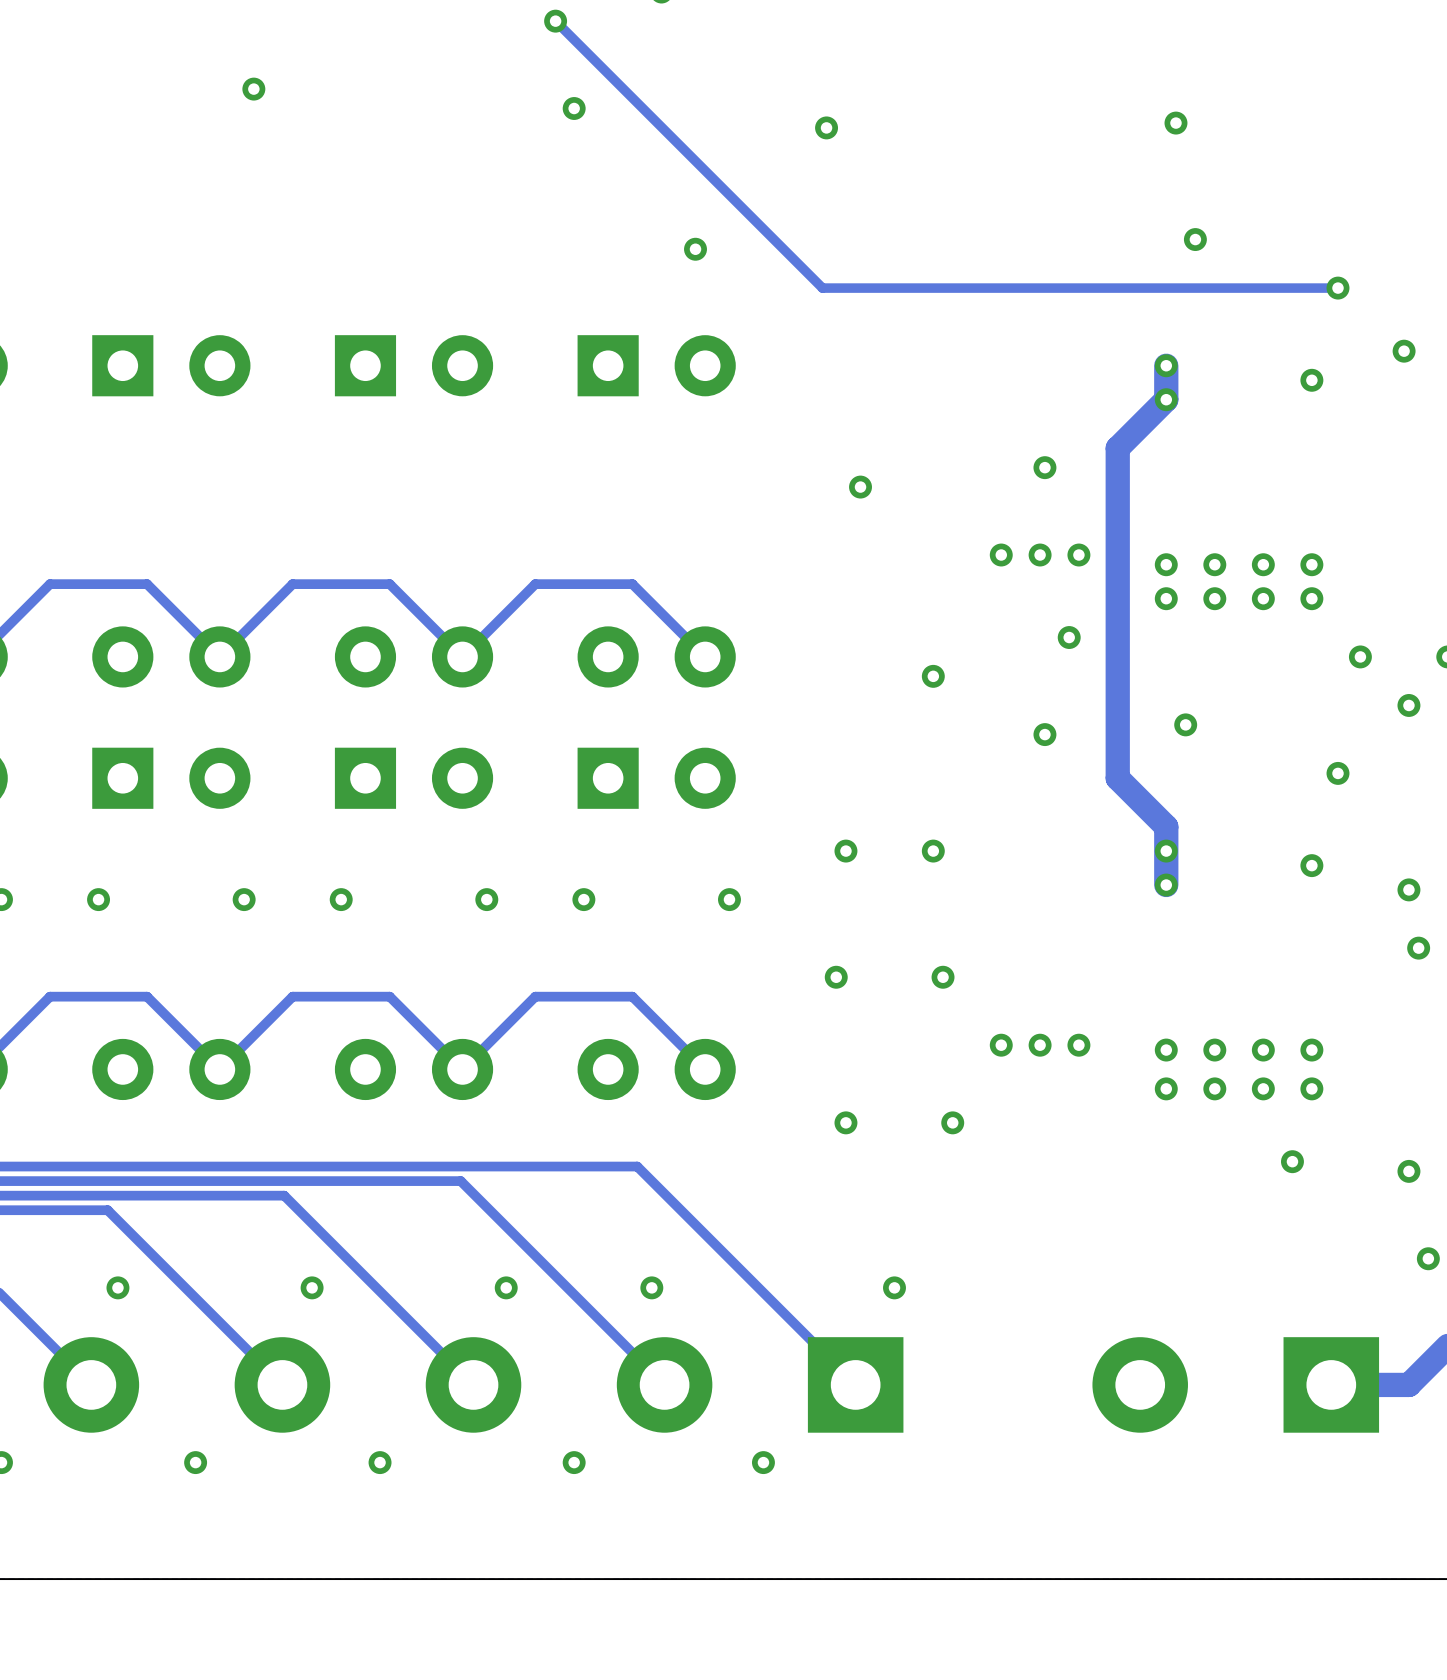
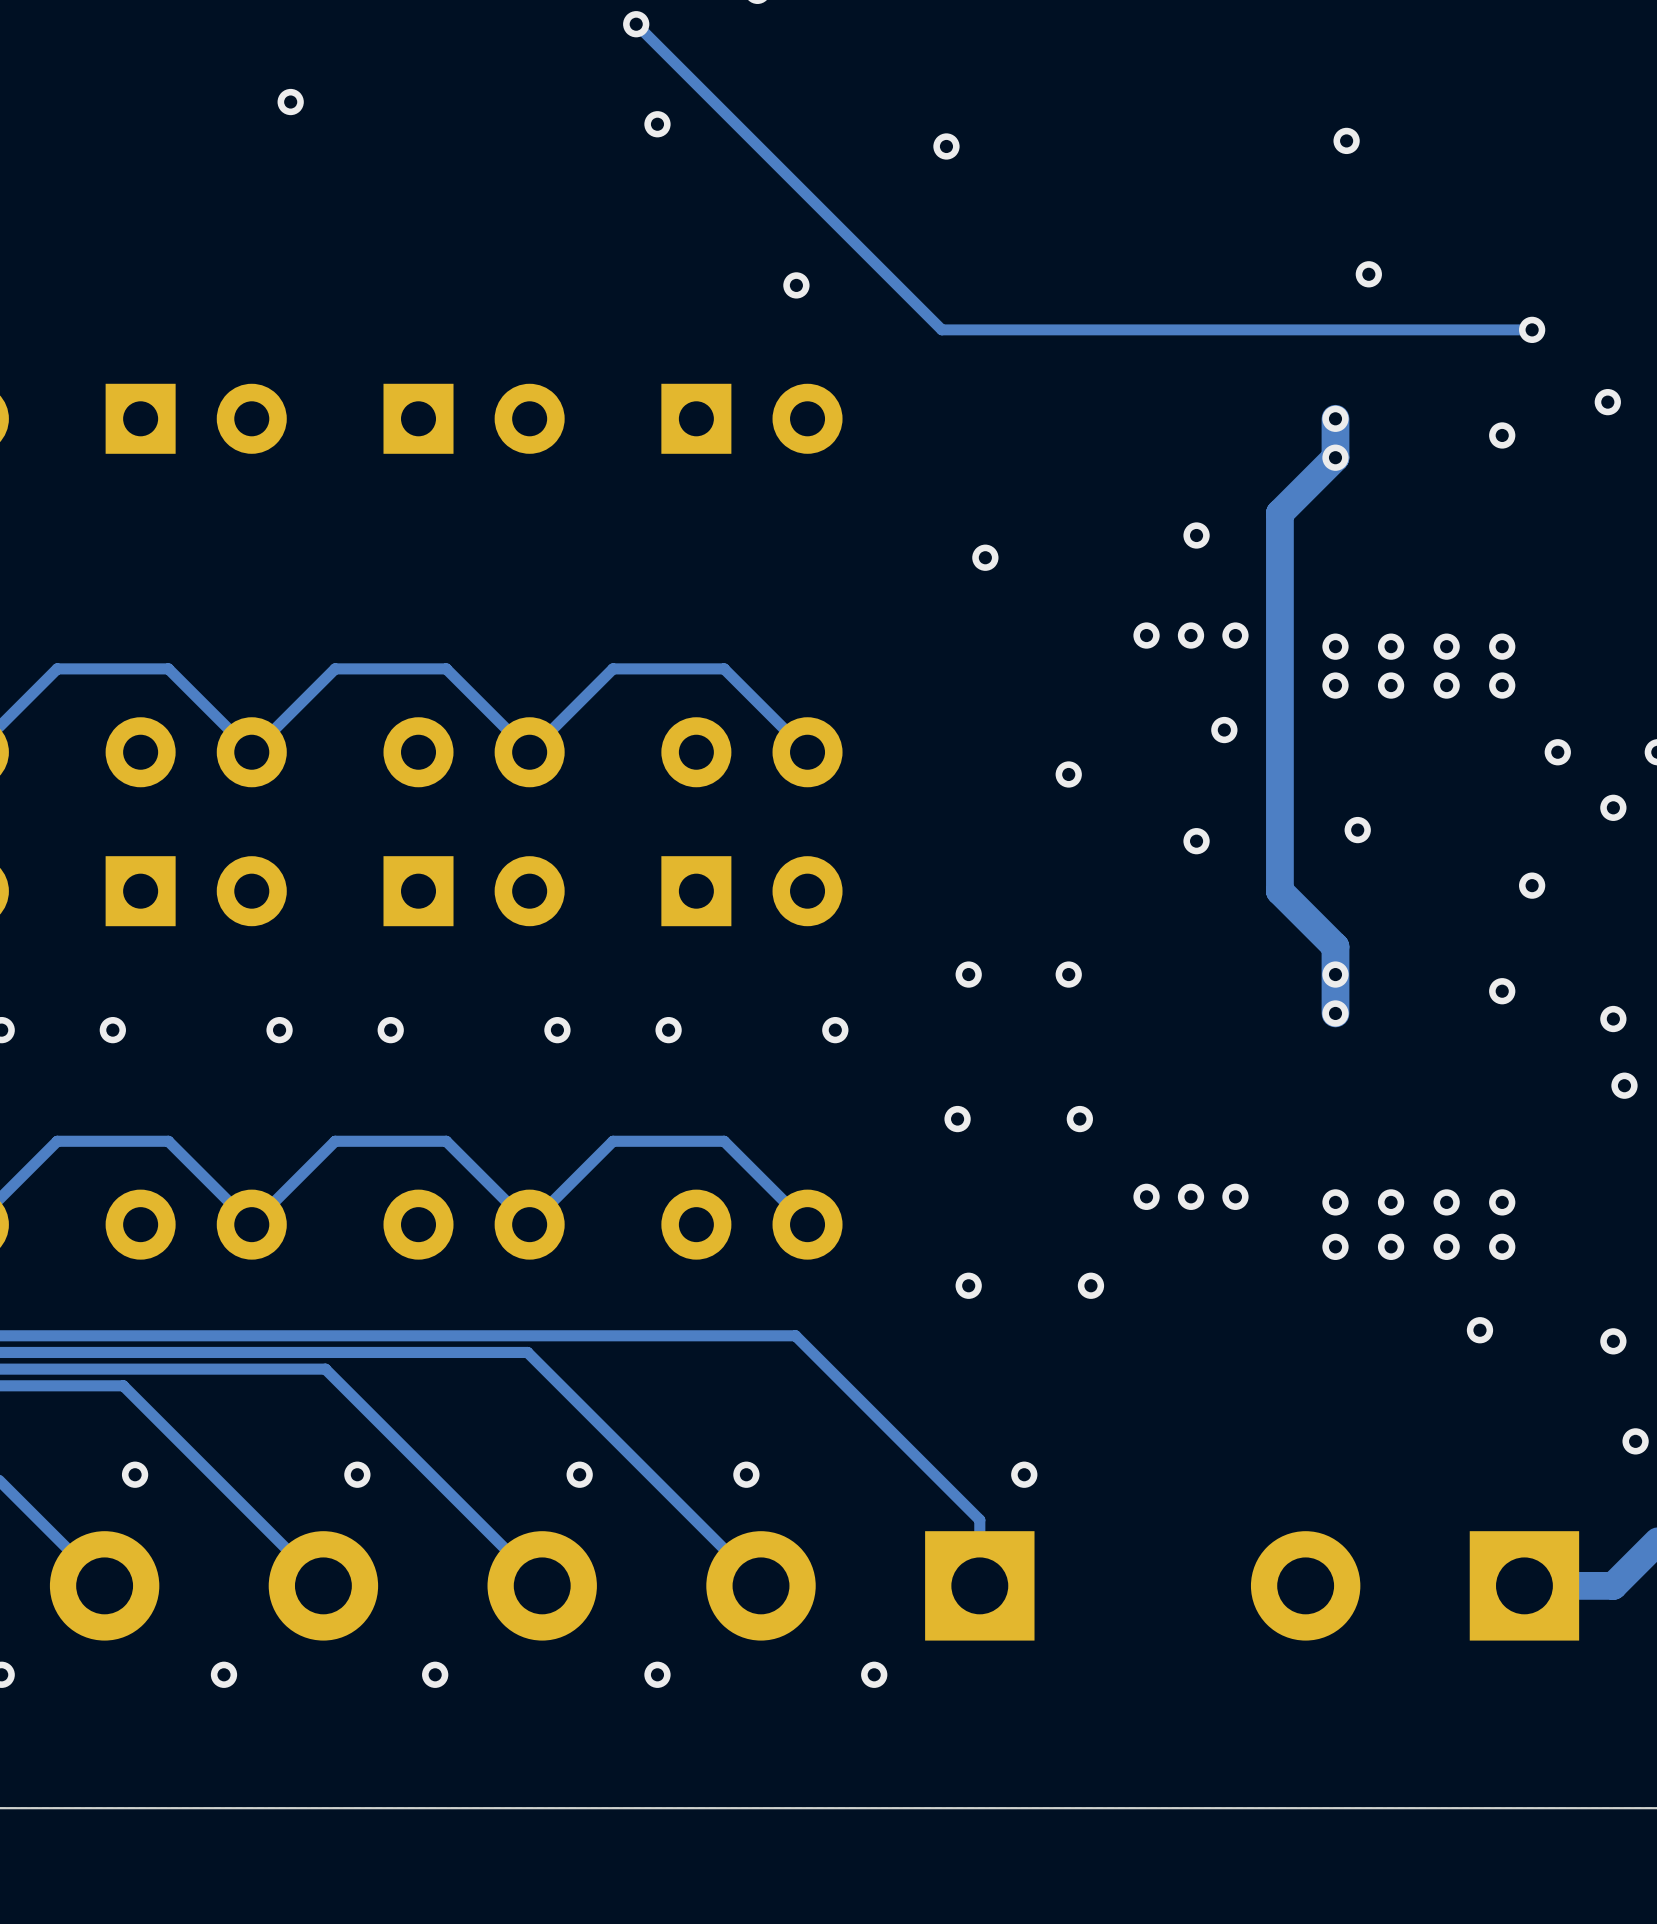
track: (637, 1166) (855, 1384) -> (729, 1335) (795, 1335) (979, 1520) (979, 1585)

